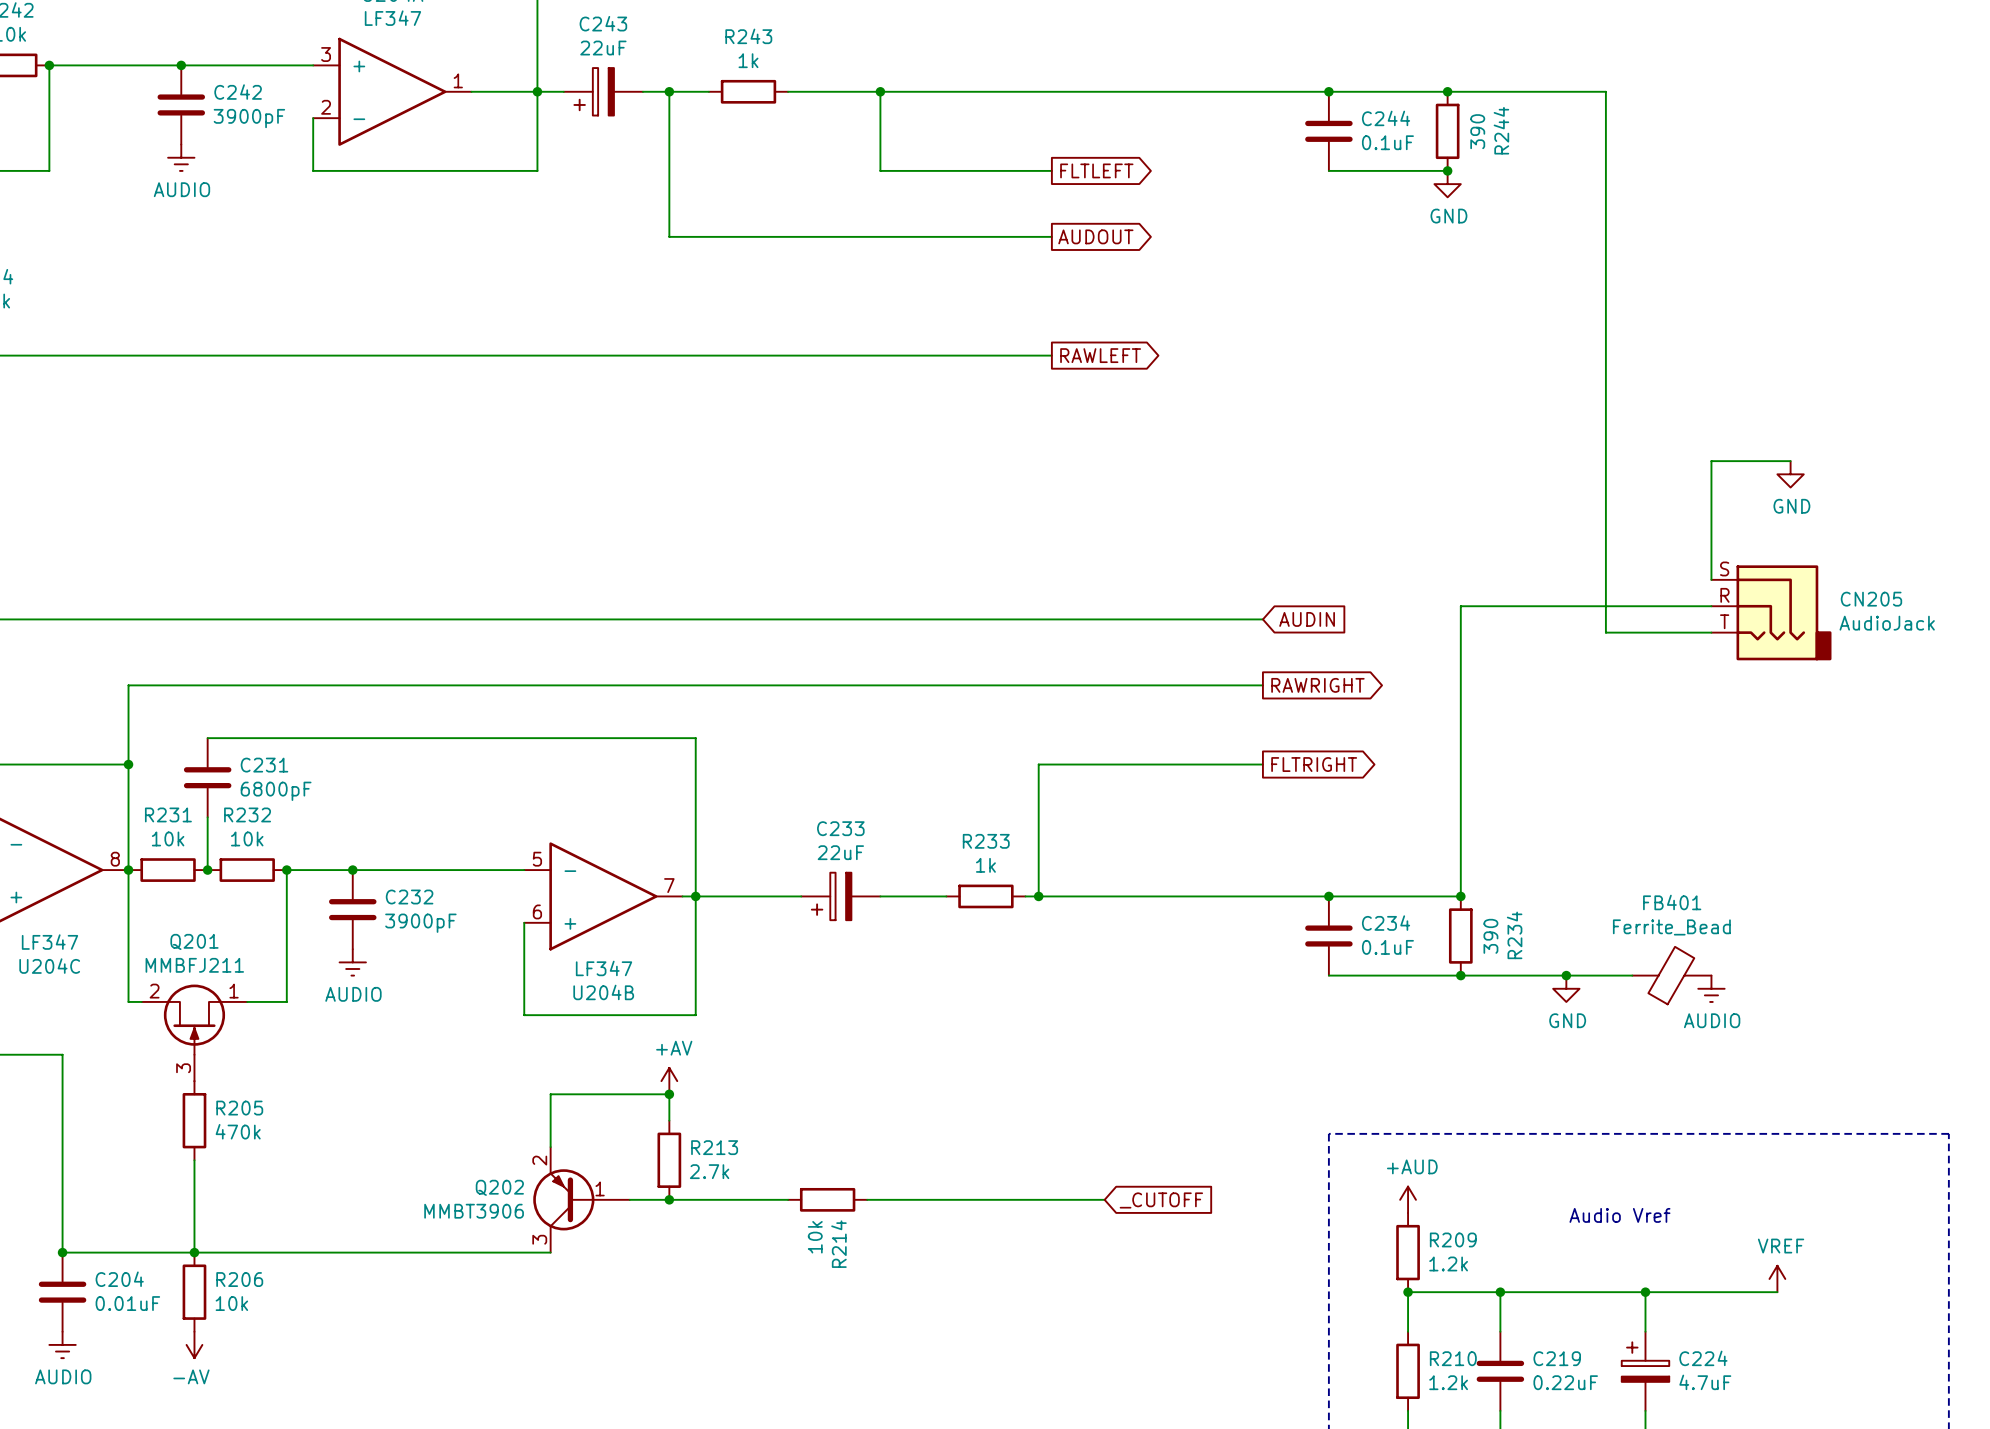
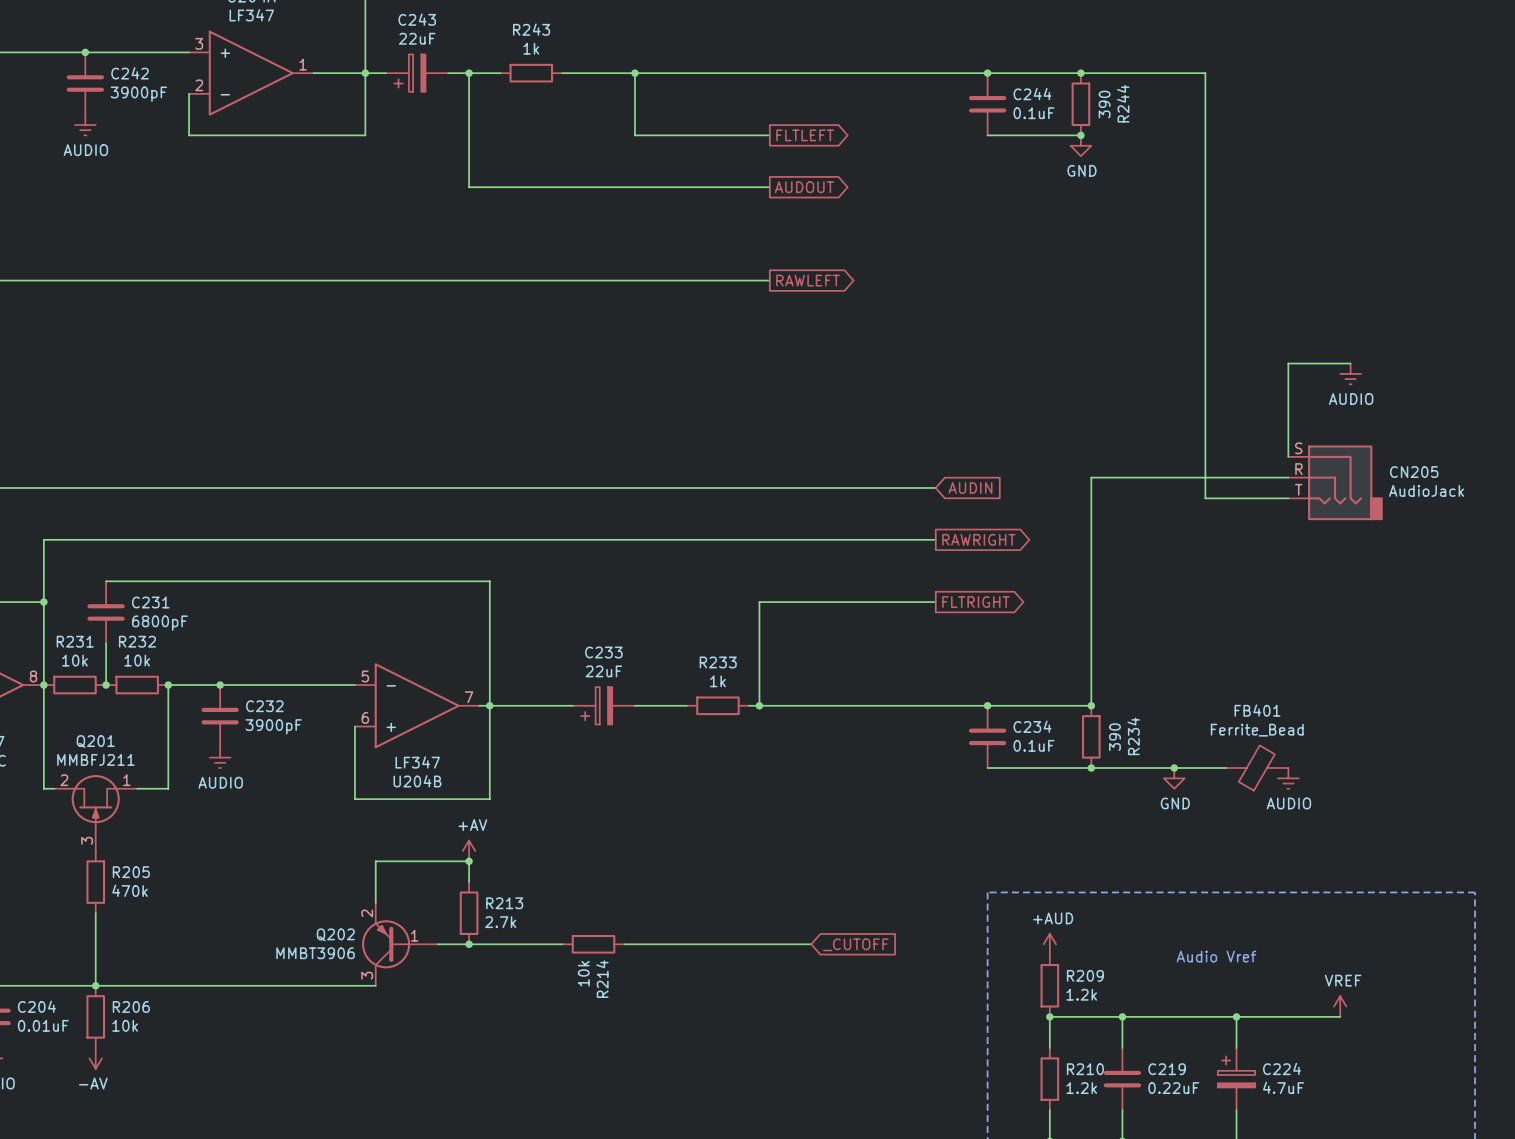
power symbol: GND (1790, 474) -> AUDIO (1350, 373)

